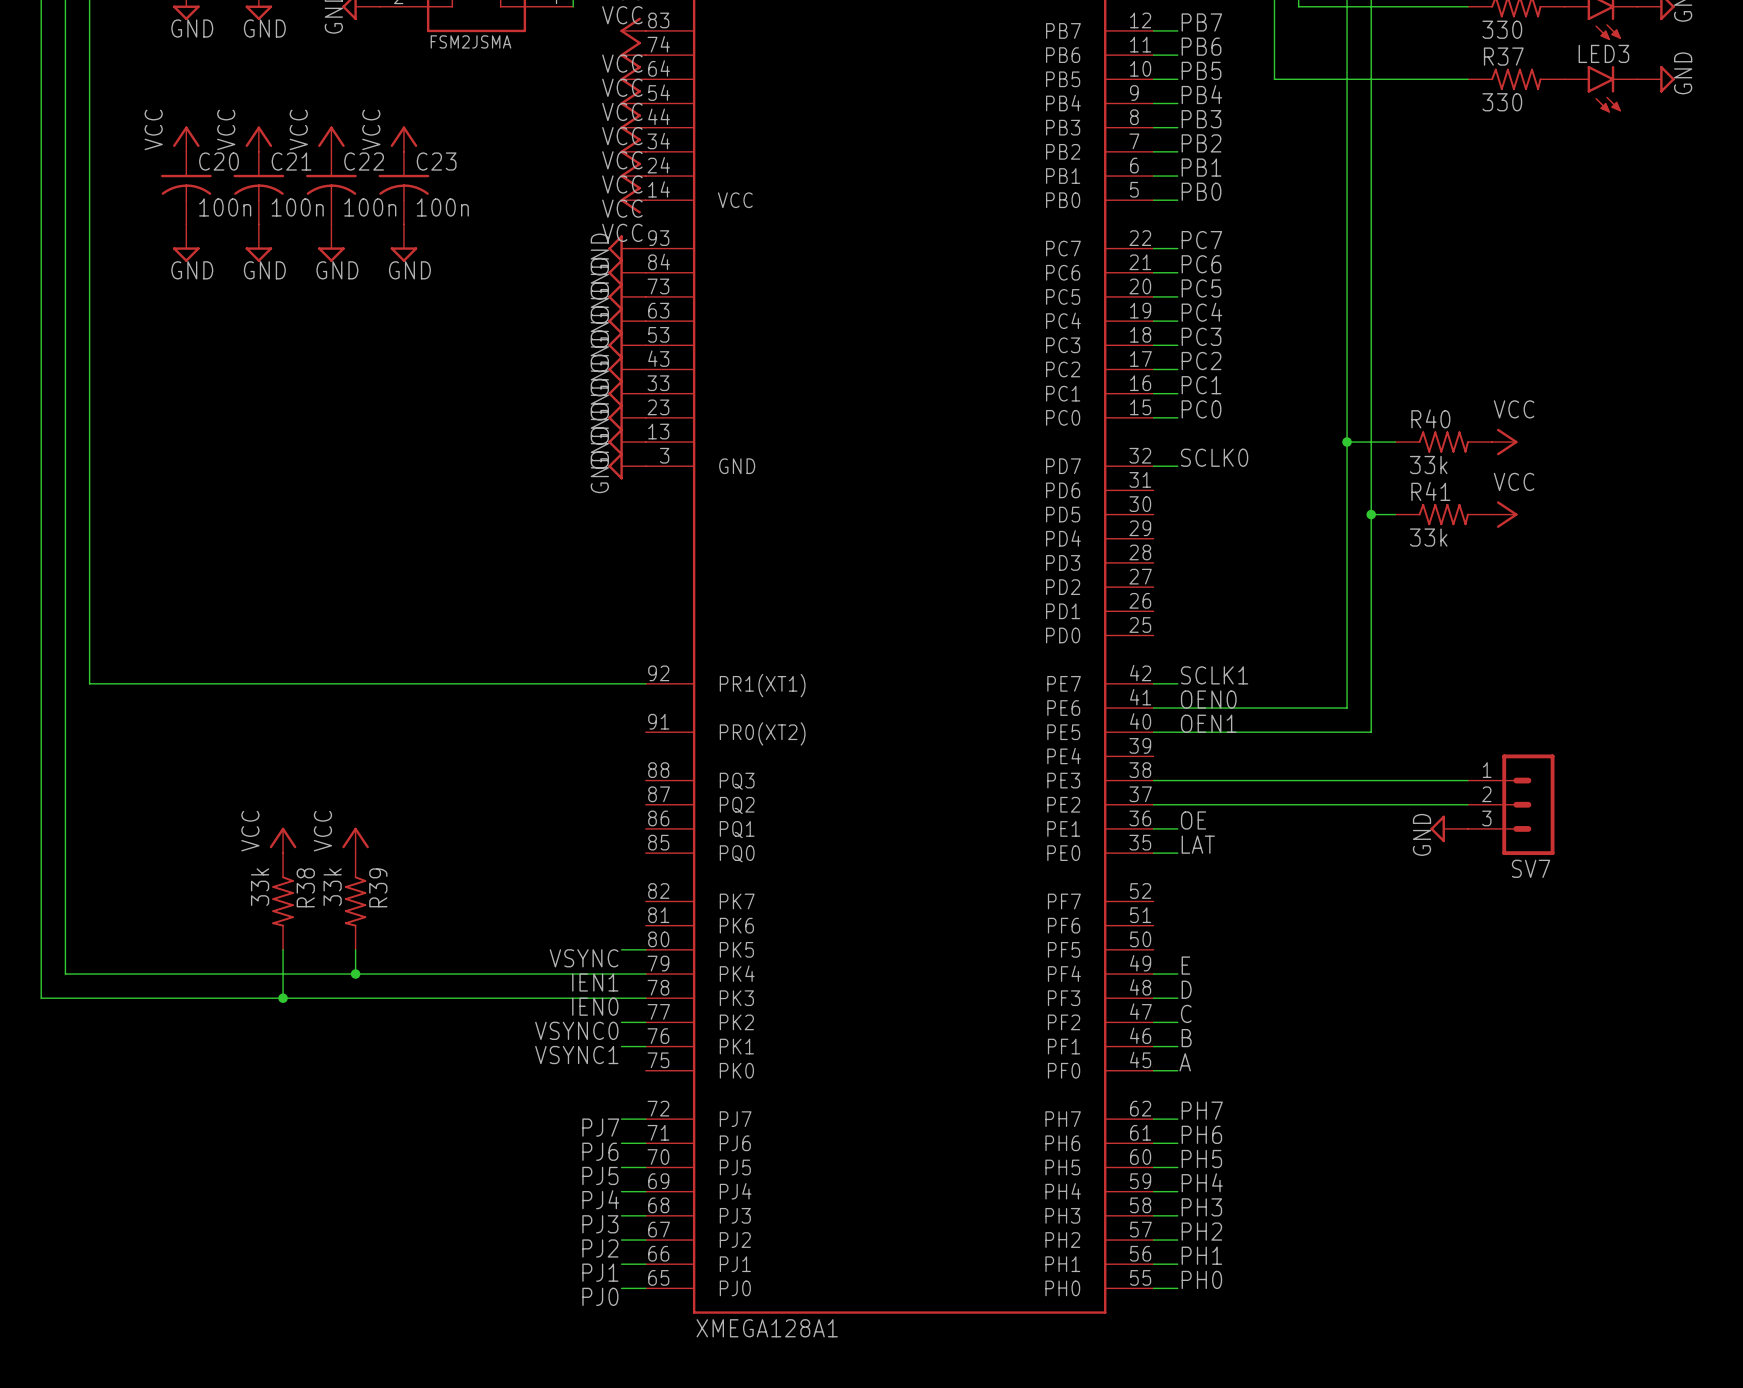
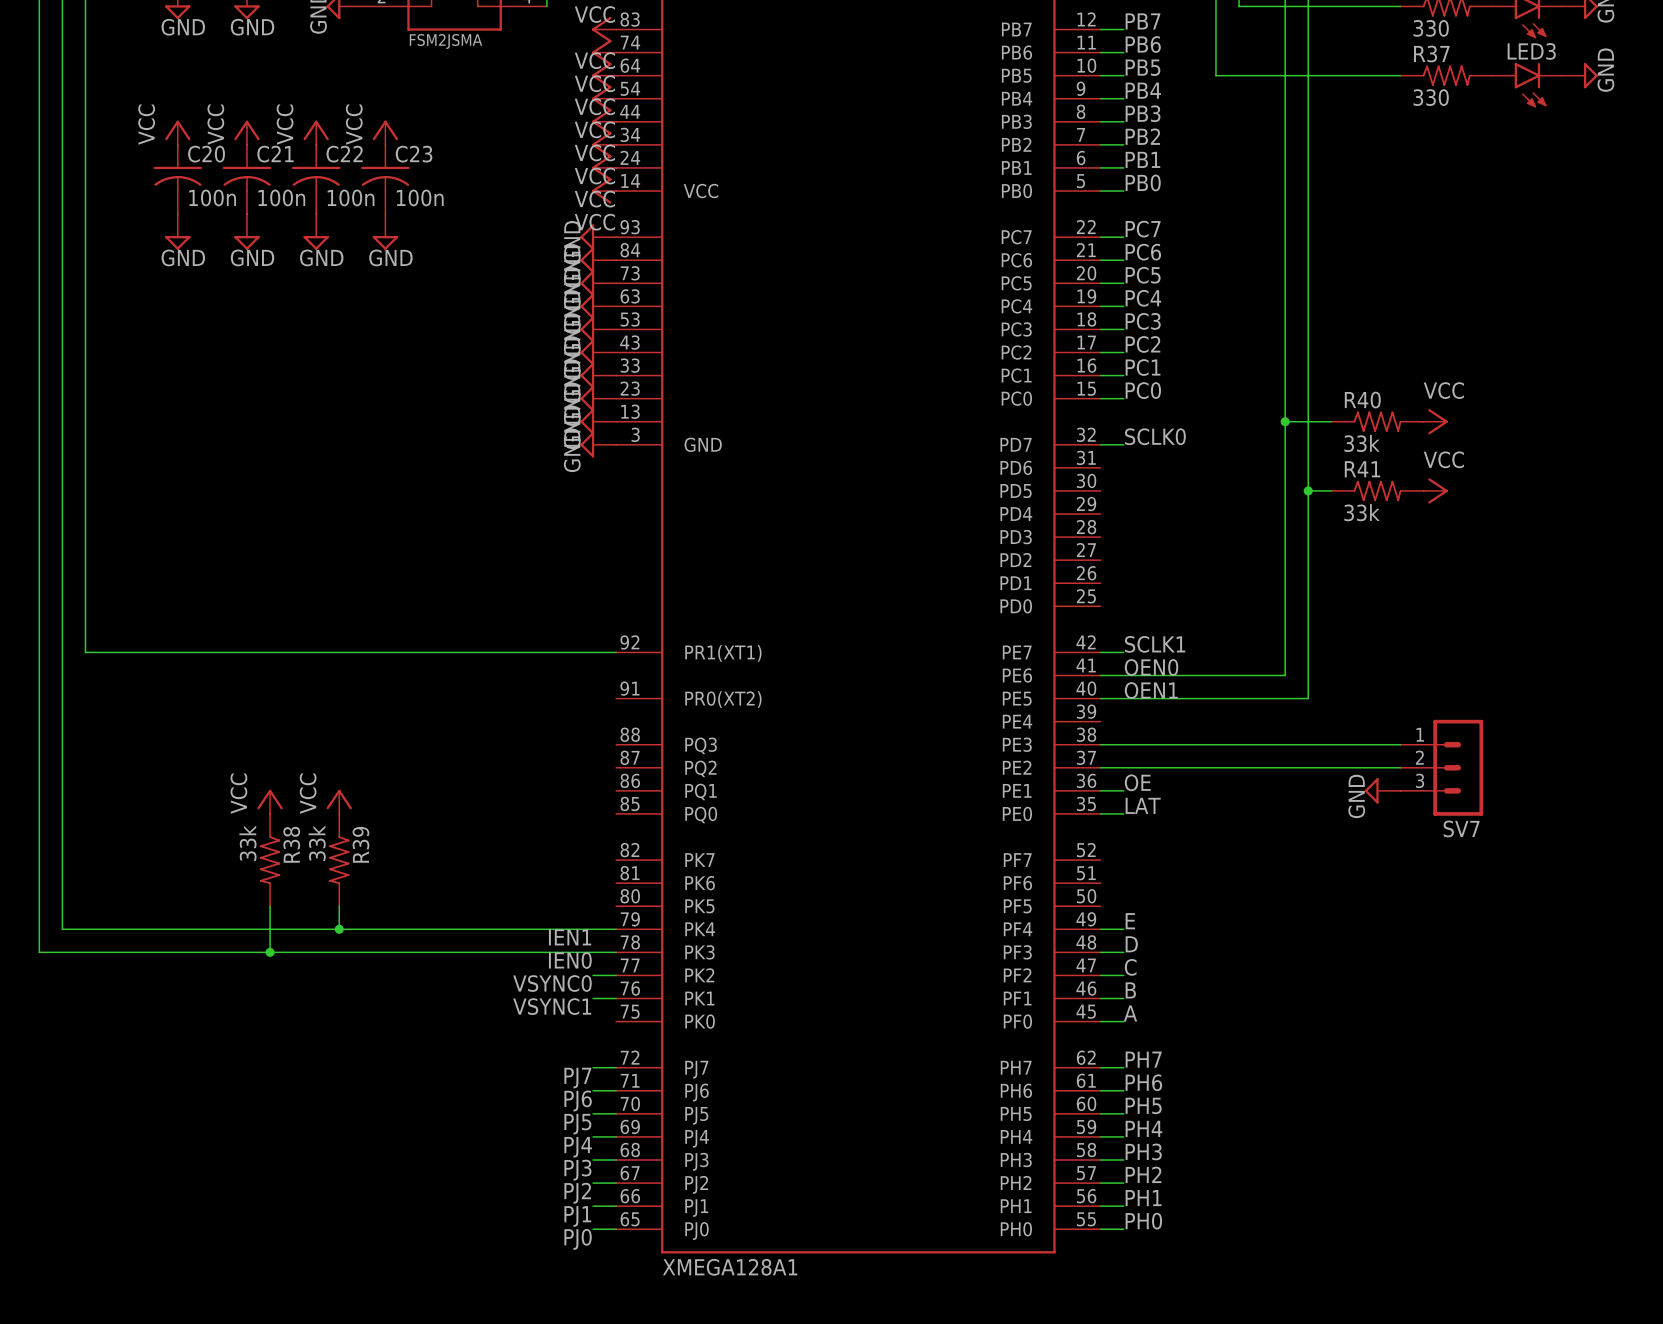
wire: (621, 949) (645, 949) -> none
label: VSYNC (584, 958) -> none

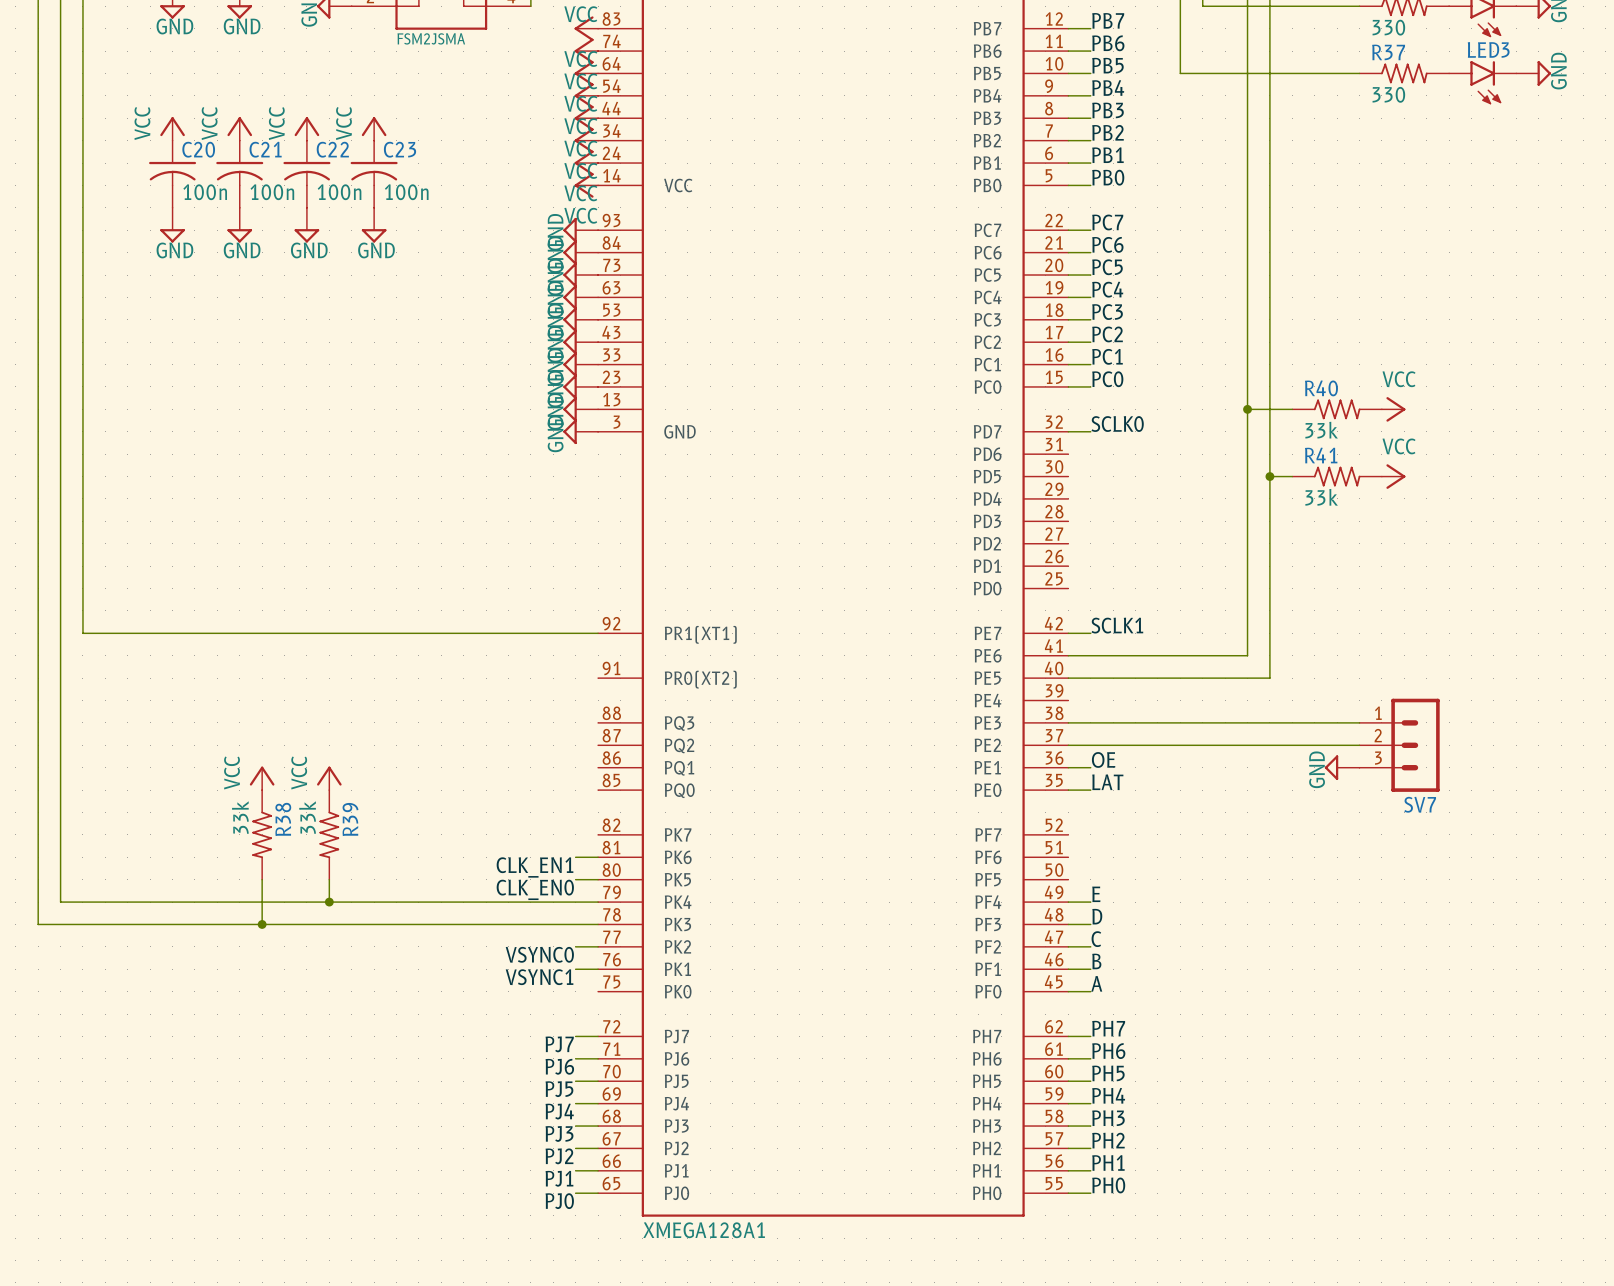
label: OEN0 (1151, 667) -> none
label: OEN1 (1151, 690) -> none
wire: none -> (575, 857) (598, 857)
label: none -> CLK_EN1 (535, 867)
wire: none -> (575, 879) (598, 879)
label: none -> CLK_EN0 (535, 889)
label: IEN1 (570, 937) -> none
label: IEN0 (570, 960) -> none

